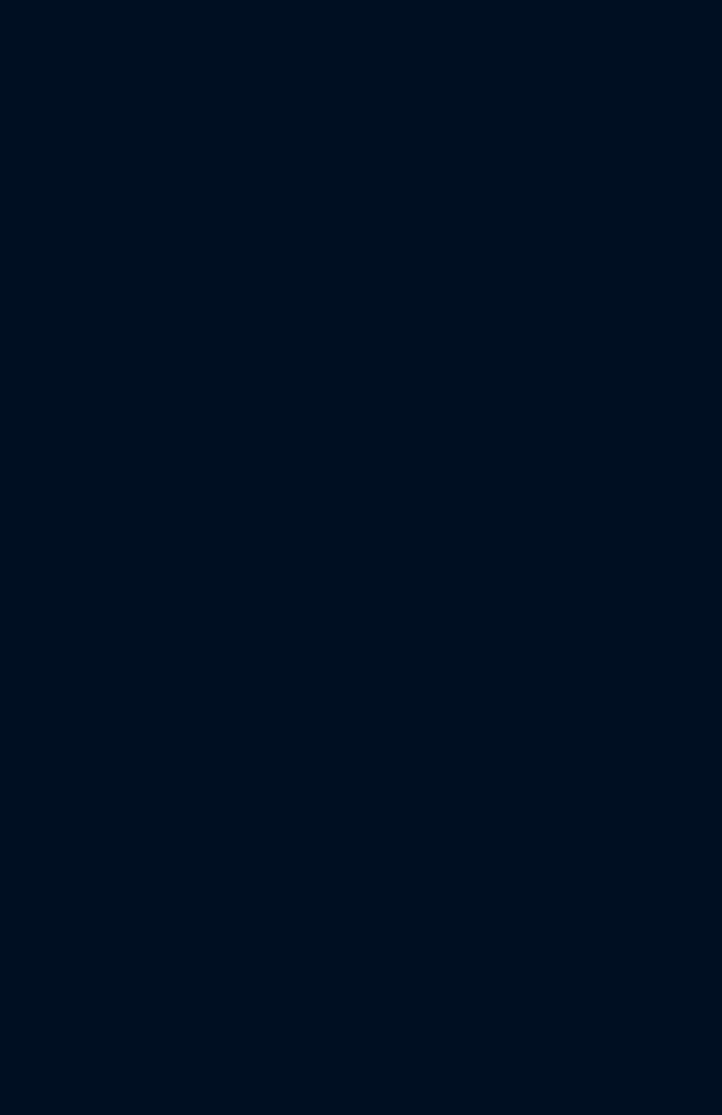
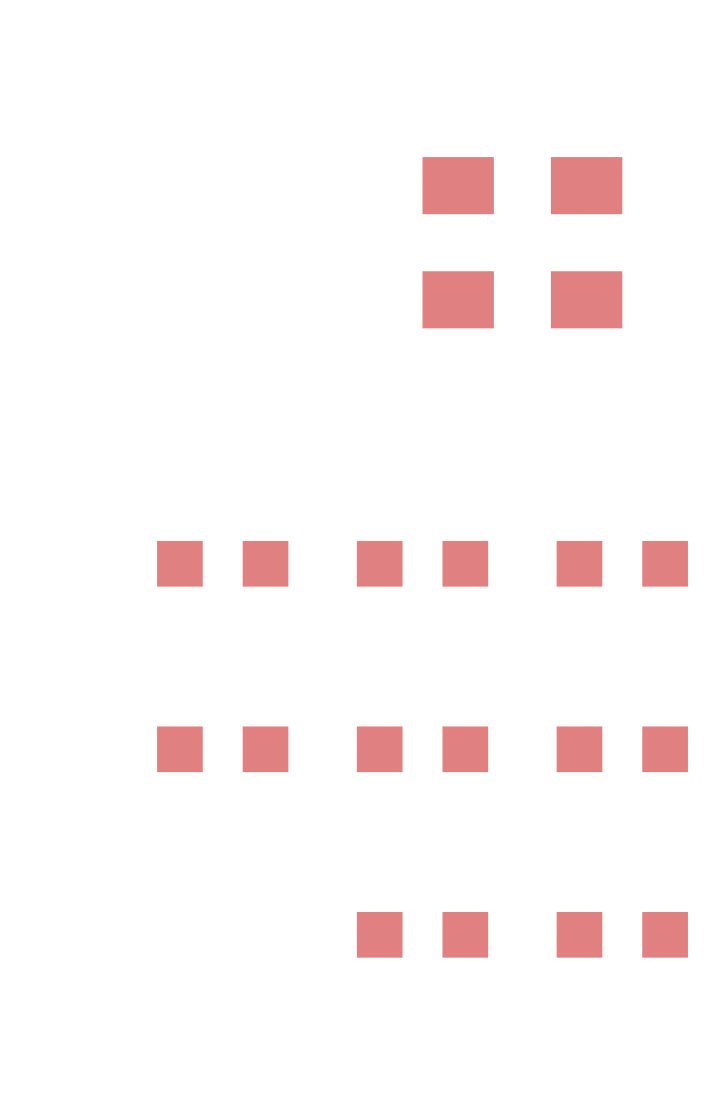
part: none -> (522, 242)
part: none -> (222, 563)
part: none -> (422, 563)
part: none -> (622, 563)
part: none -> (222, 749)
part: none -> (422, 749)
part: none -> (622, 749)
part: none -> (422, 934)
part: none -> (622, 934)

